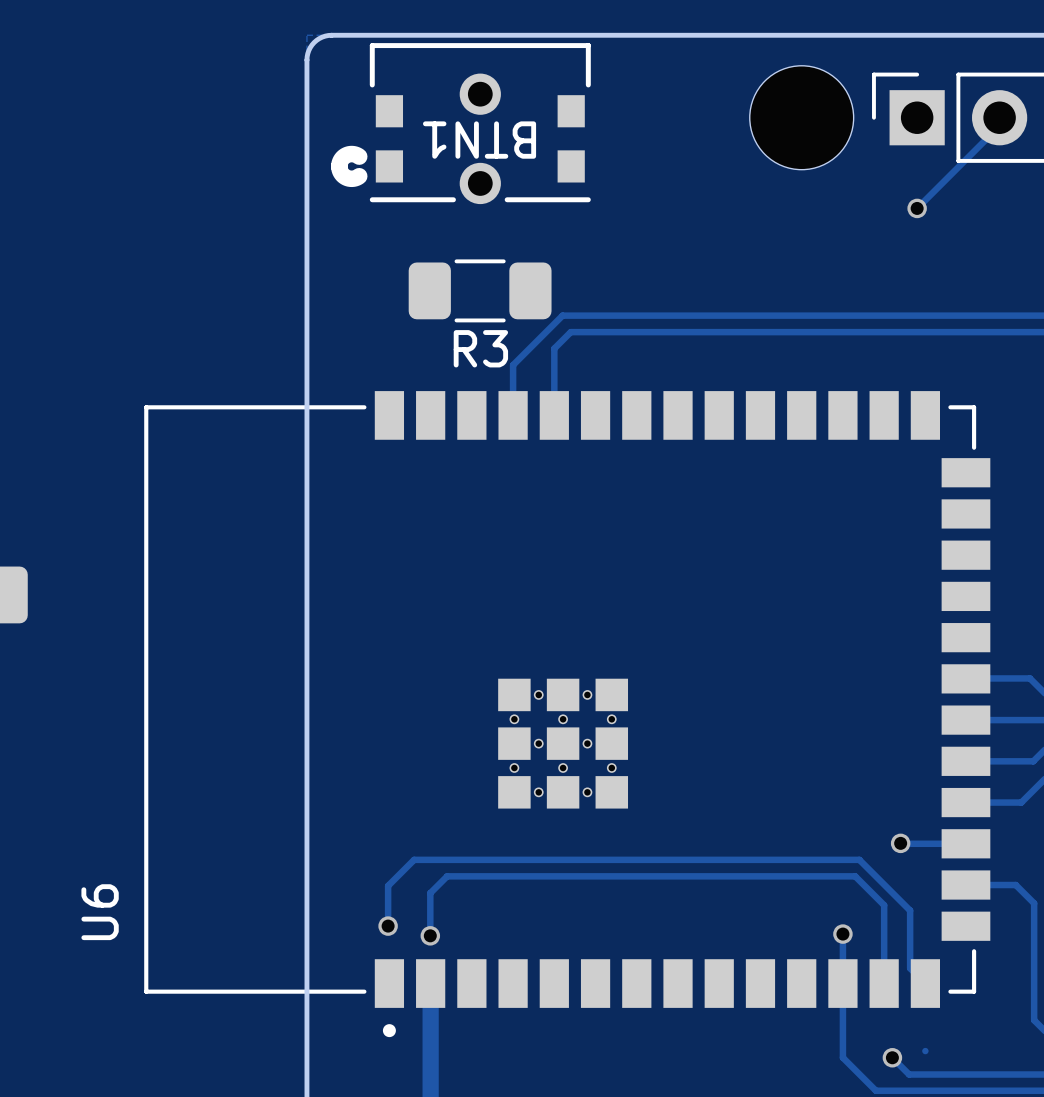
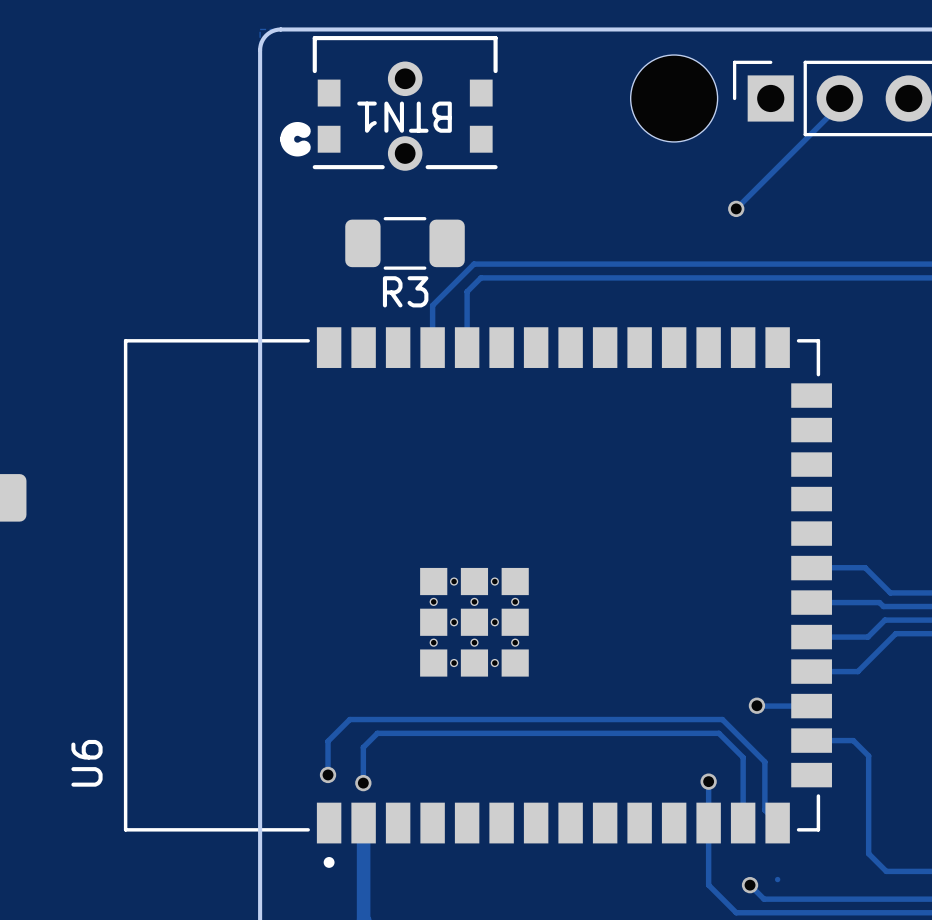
track: none -> (770, 174) (736, 208)
via position: (917, 208) -> (736, 208)

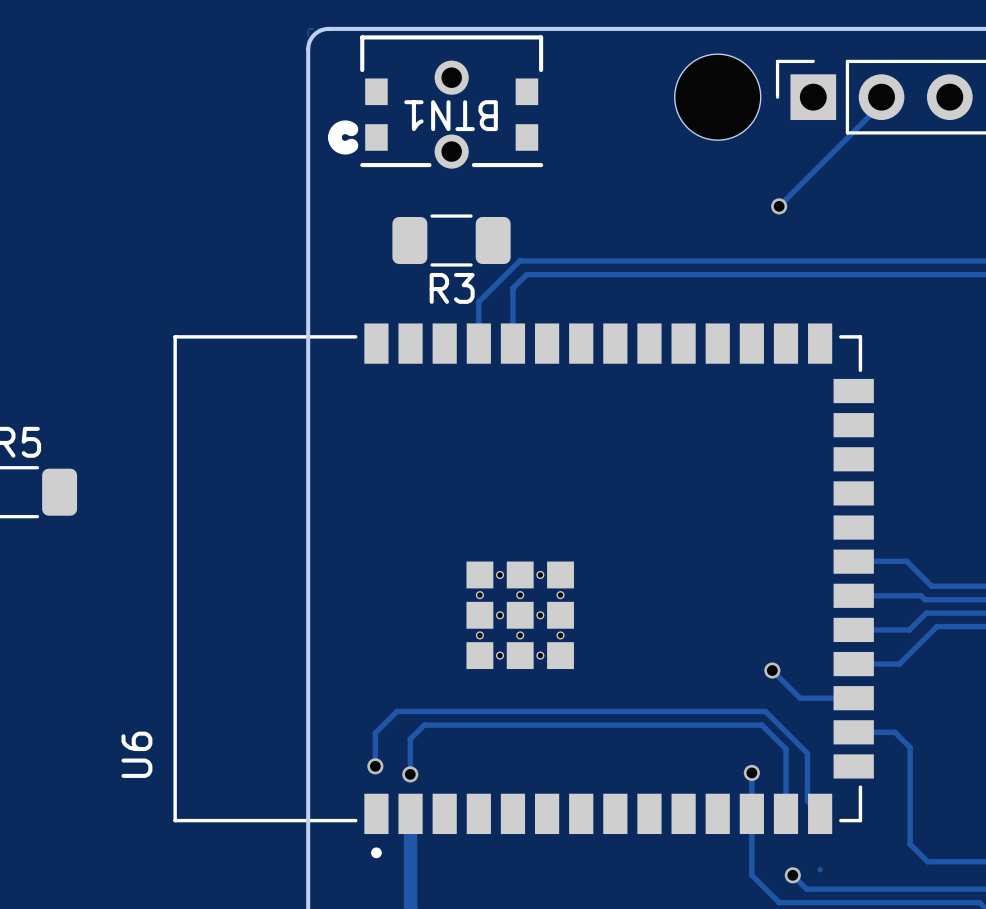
track: none -> (772, 670) (799, 697)
via position: (756, 705) -> (772, 670)

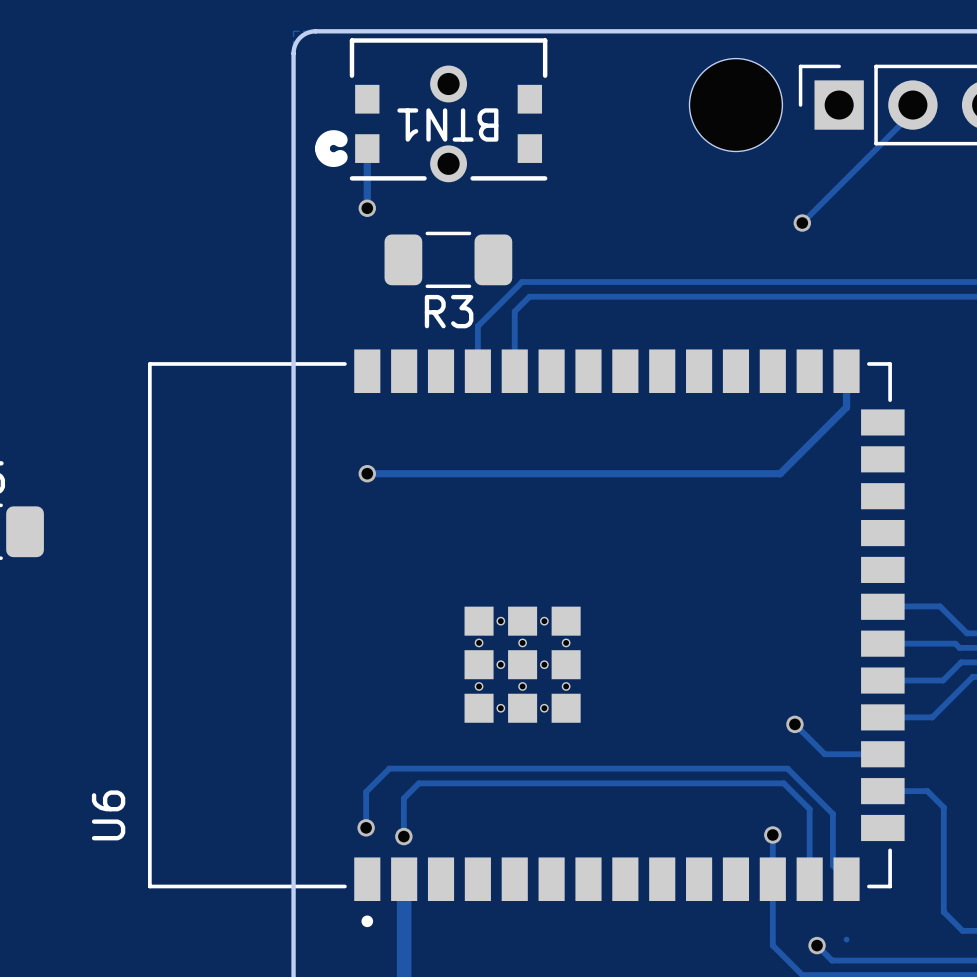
track: none -> (367, 148) (367, 208)
via: none -> (367, 208)
track: none -> (846, 371) (846, 407) (780, 473) (367, 473)
via: none -> (367, 473)

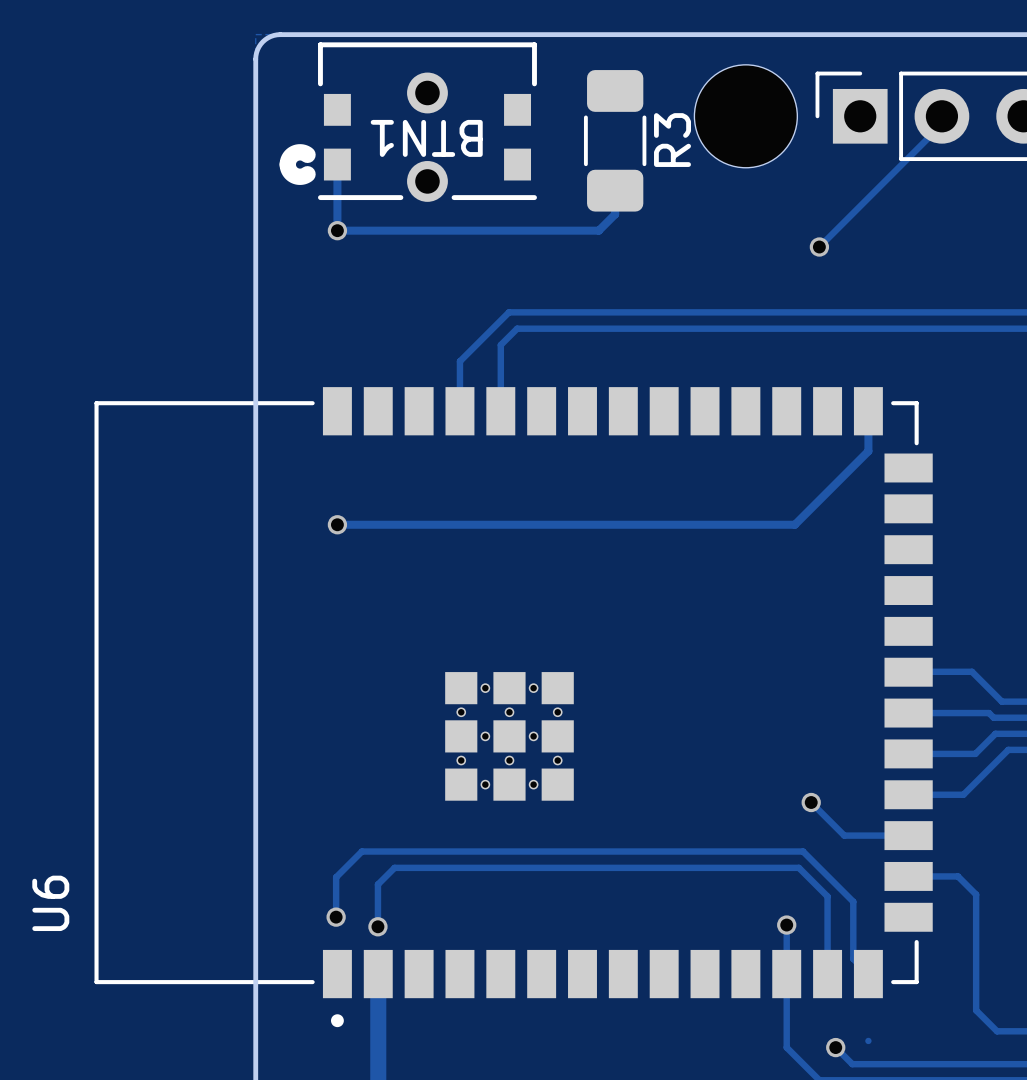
track: none -> (615, 190) (615, 214) (598, 230) (337, 230)
R3 rotation: 0° (448, 259) -> 90° clockwise (615, 140)
R3 position: (448, 259) -> (615, 140)
R3 name position: R3 (449, 311) -> R3 (672, 140)

